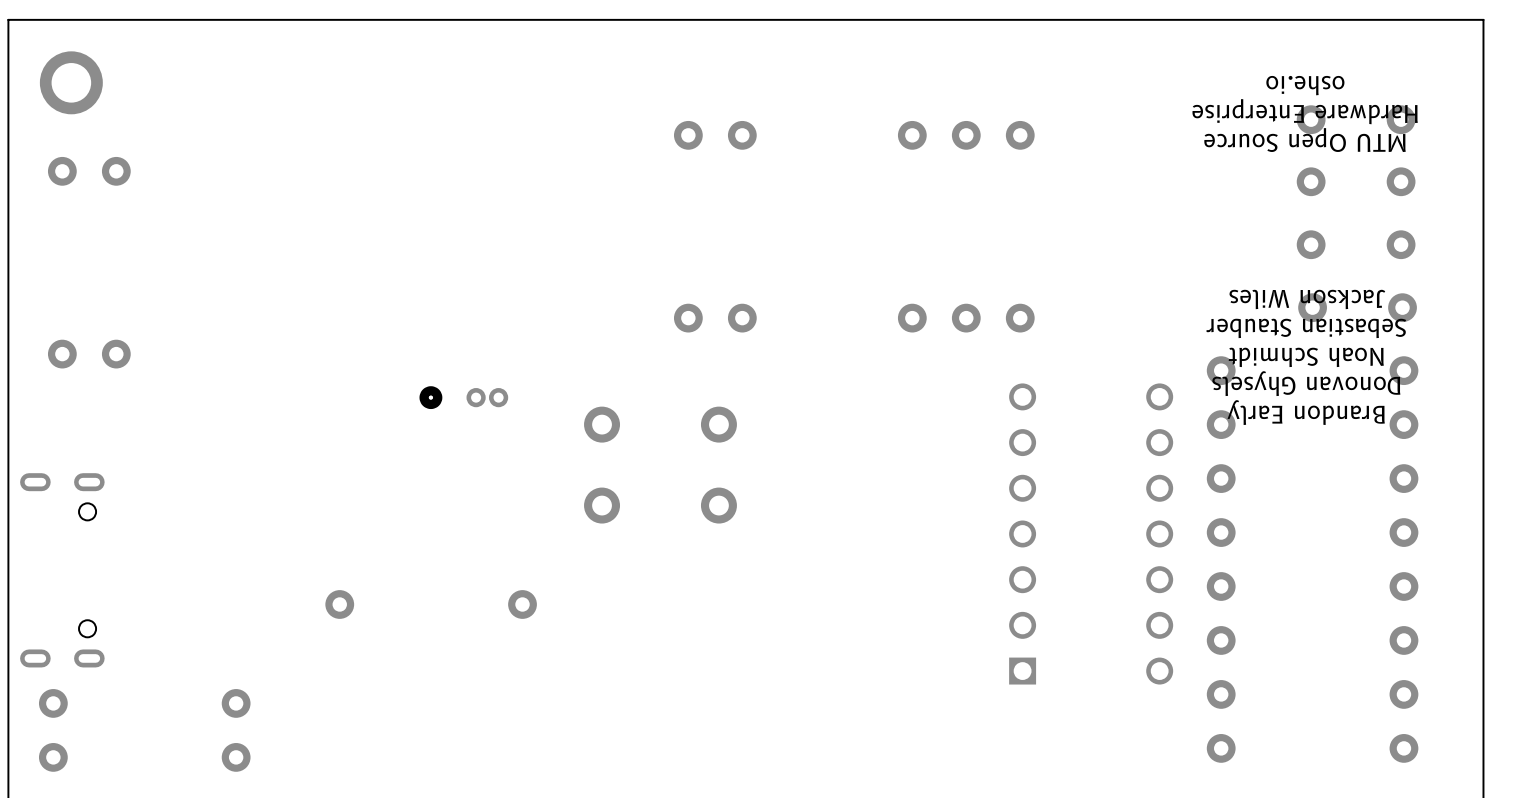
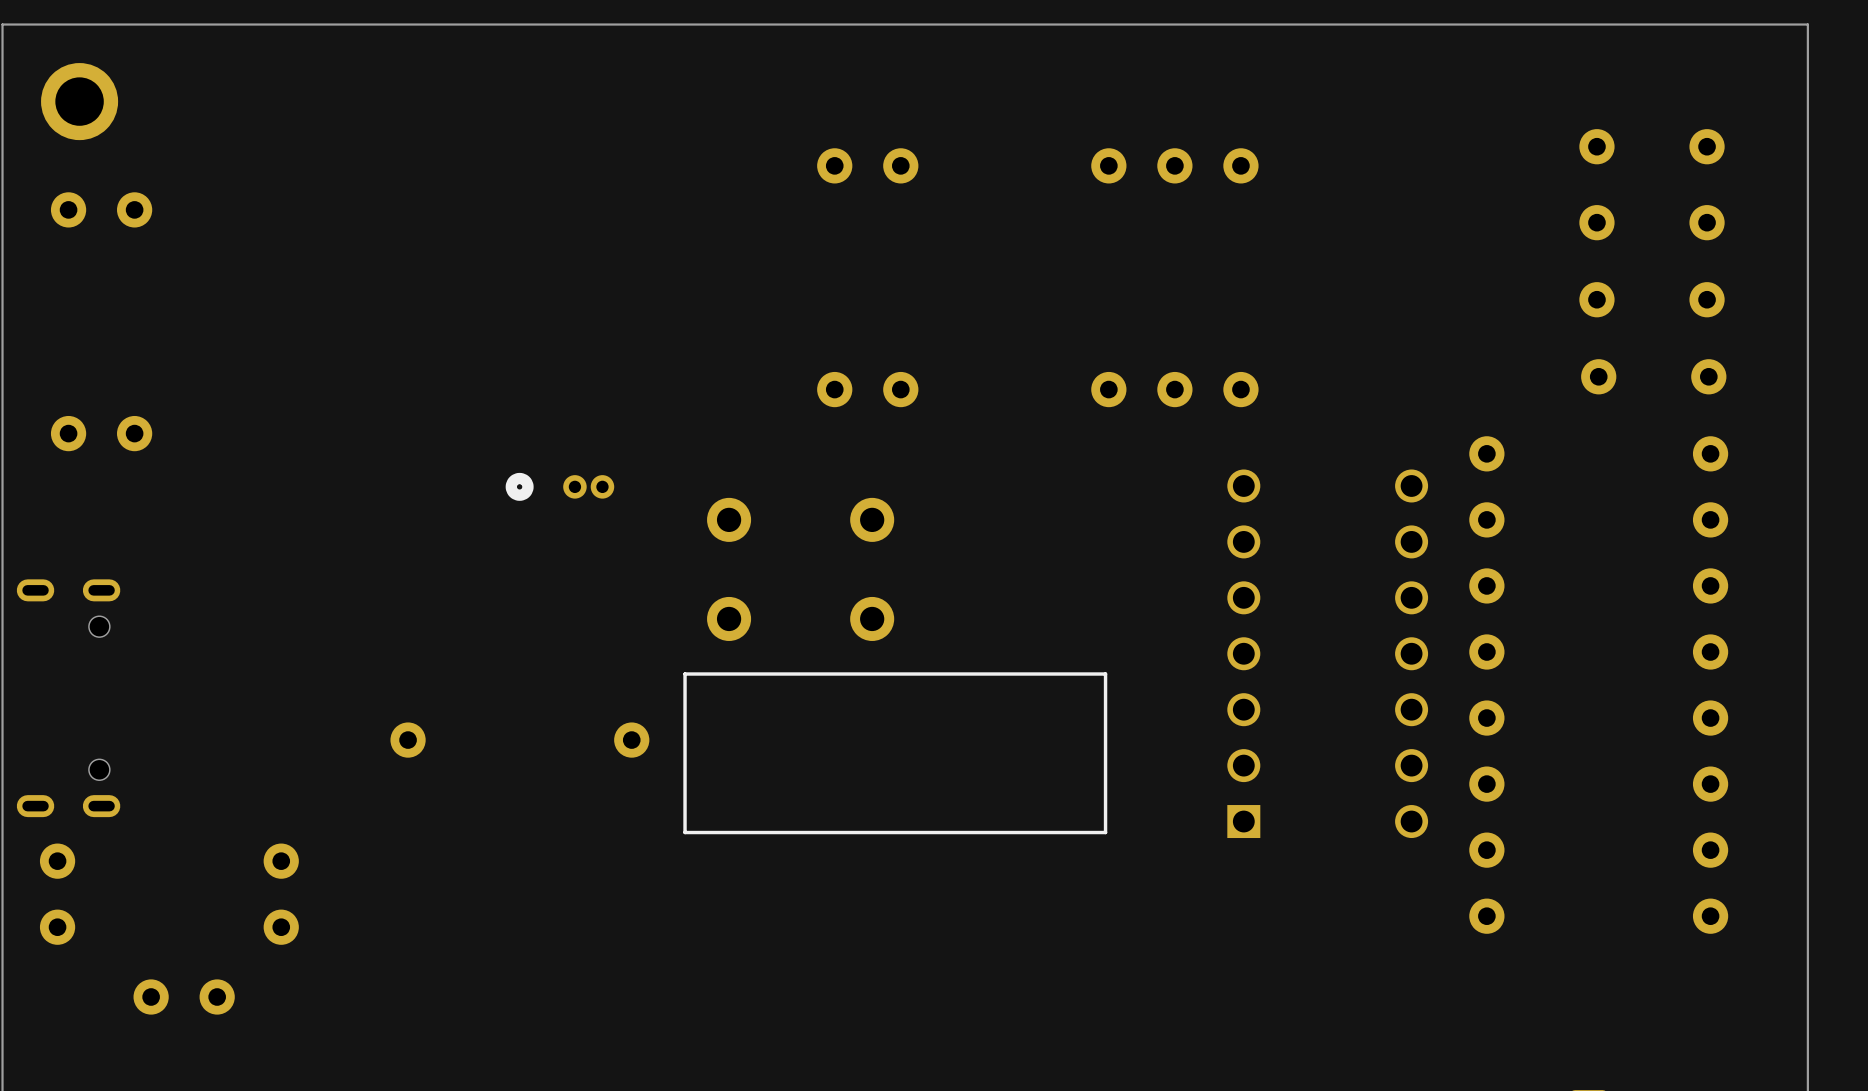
text: oshe.io (1305, 85) -> none
text: Hardware Enterprise (1305, 111) -> none
text: MTU Open Source (1305, 140) -> none
text: Jackson Wiles (1307, 299) -> none
text: Sebastian Stauber (1306, 328) -> none
text: Noah Schmidt (1306, 357) -> none
text: Donovan Ghysels (1306, 383) -> none
text: Brandon Early (1306, 412) -> none
line: none -> (1105, 674) (685, 674) (685, 832) (1105, 832) (1105, 674)

